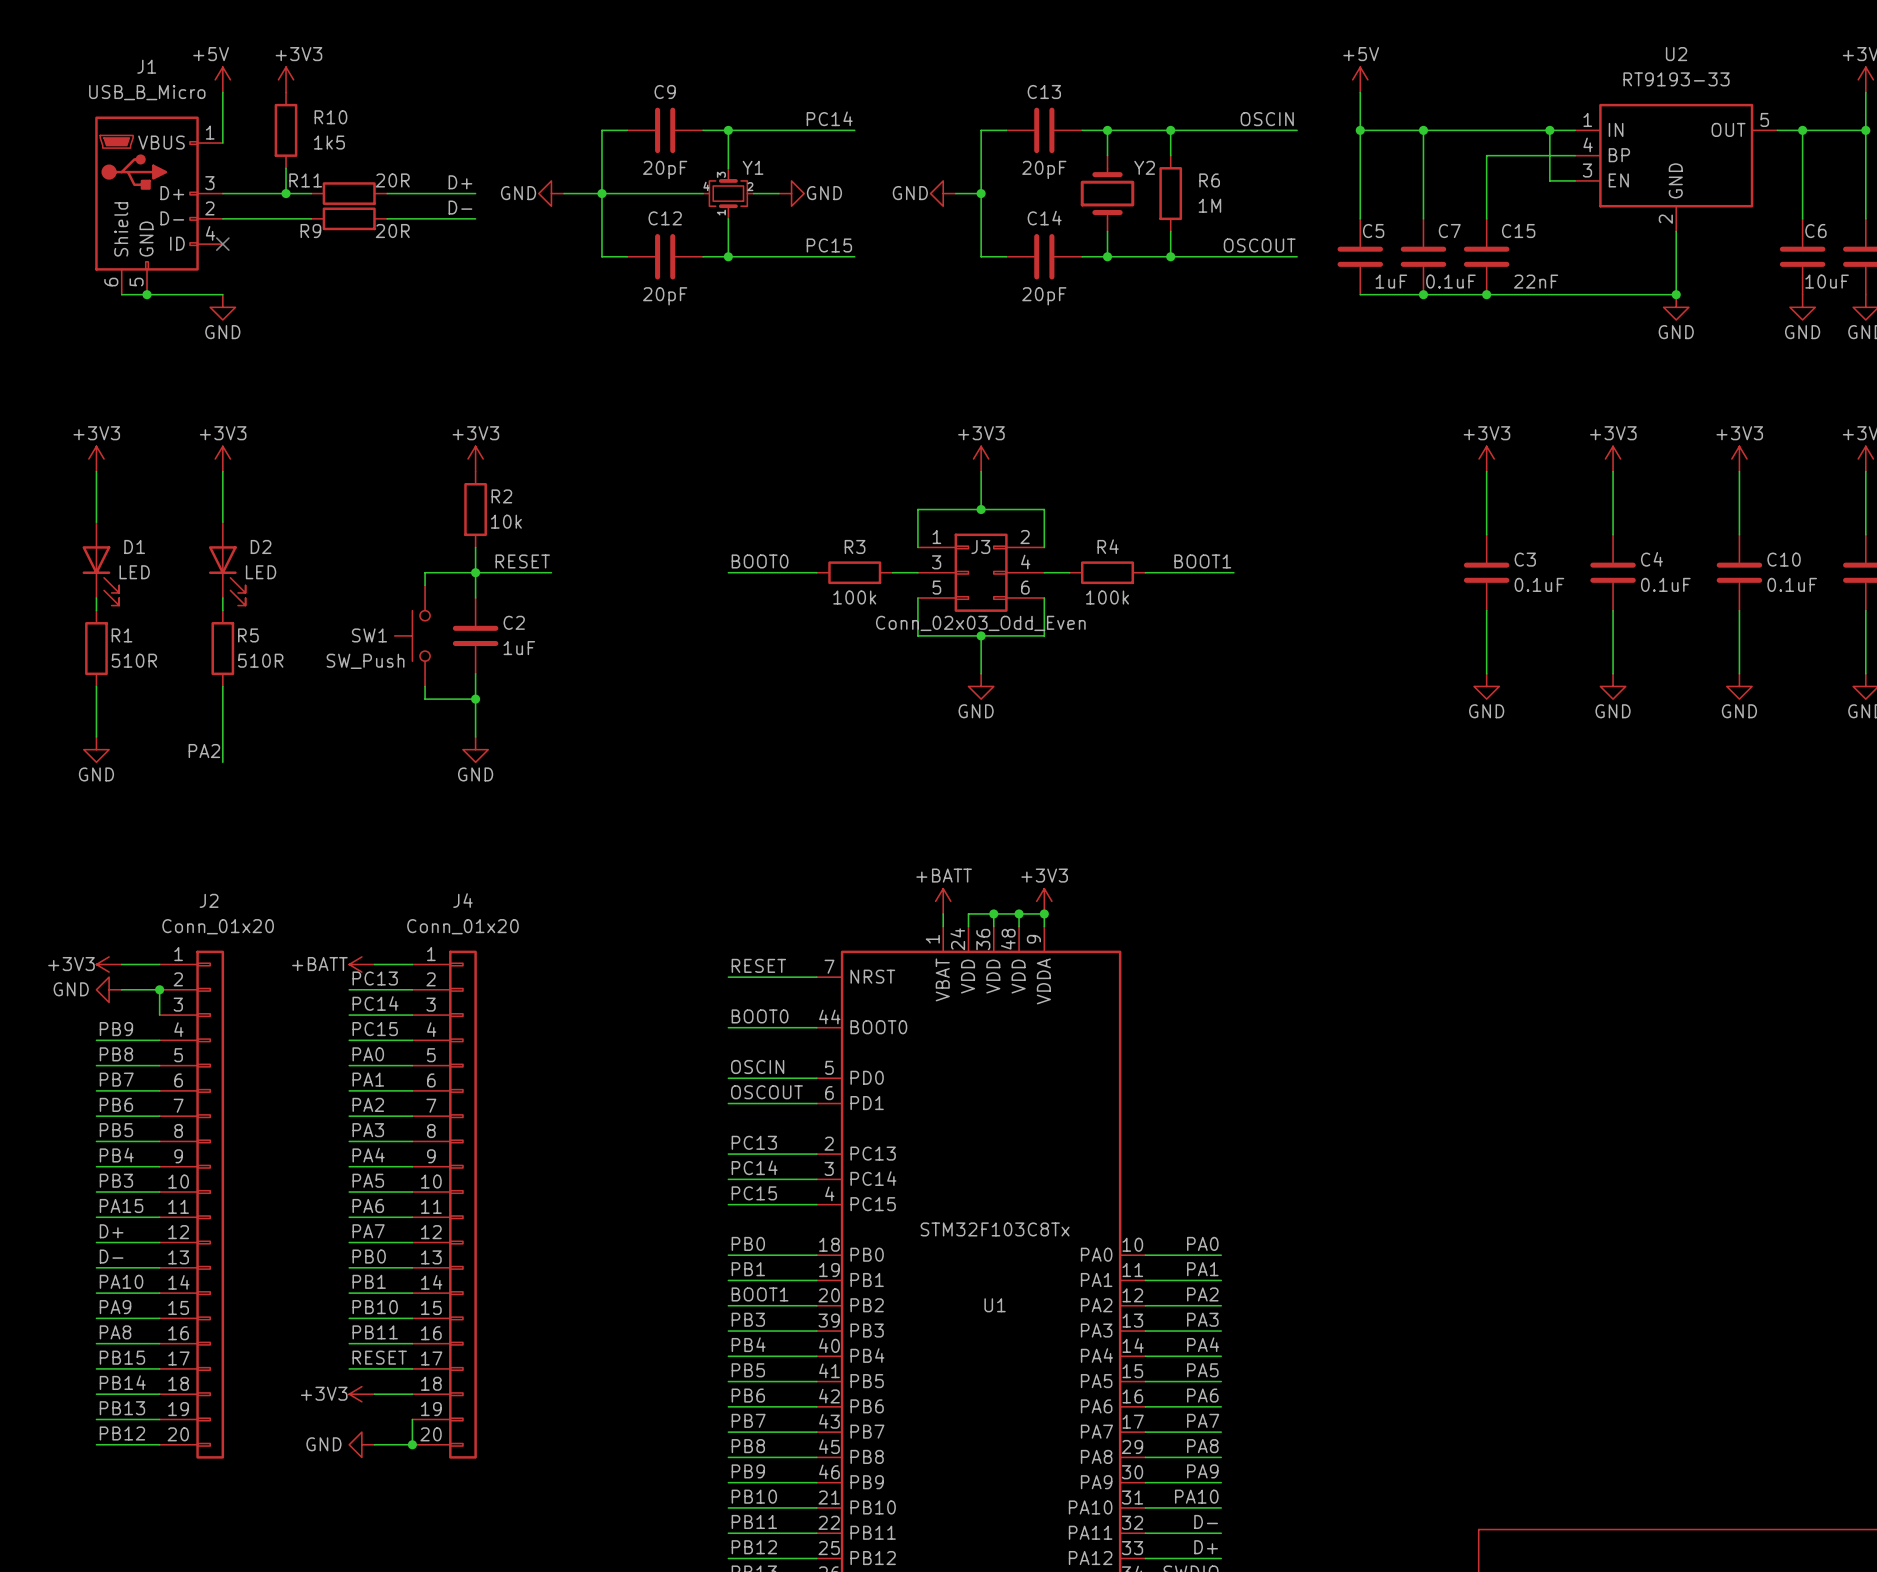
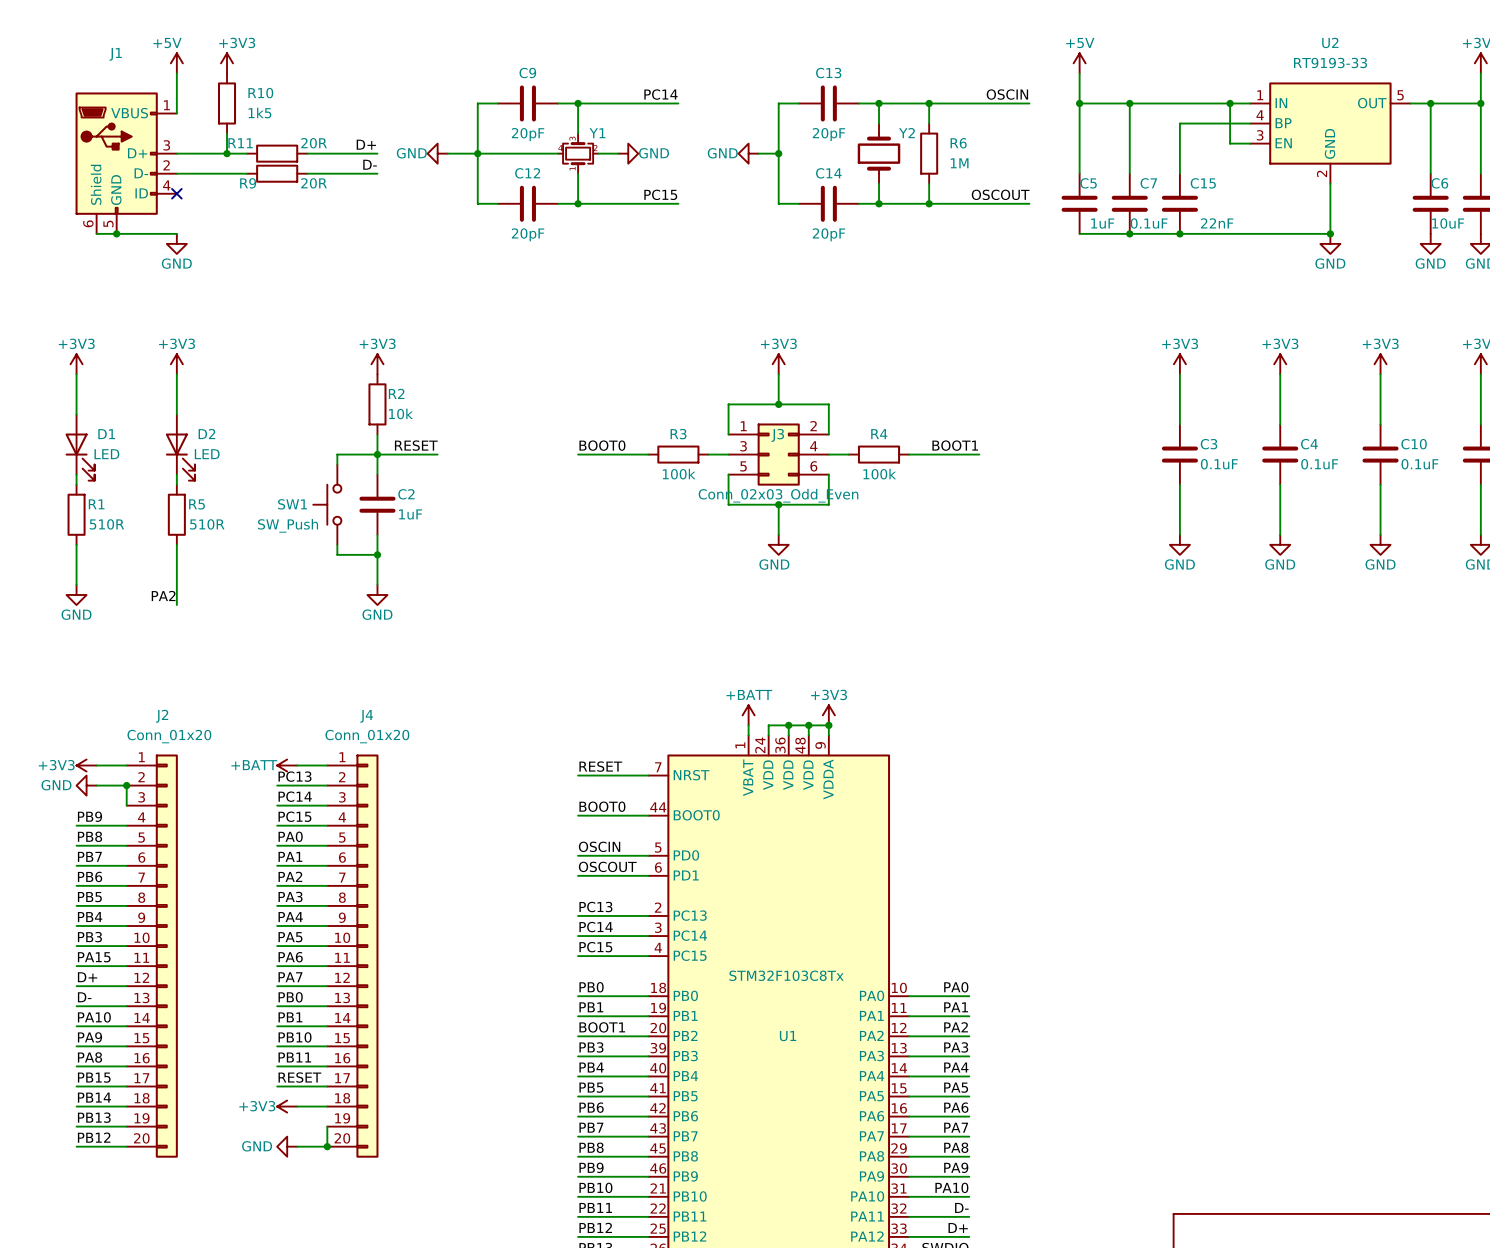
J1 value: USB_B_Micro (147, 92) -> none

